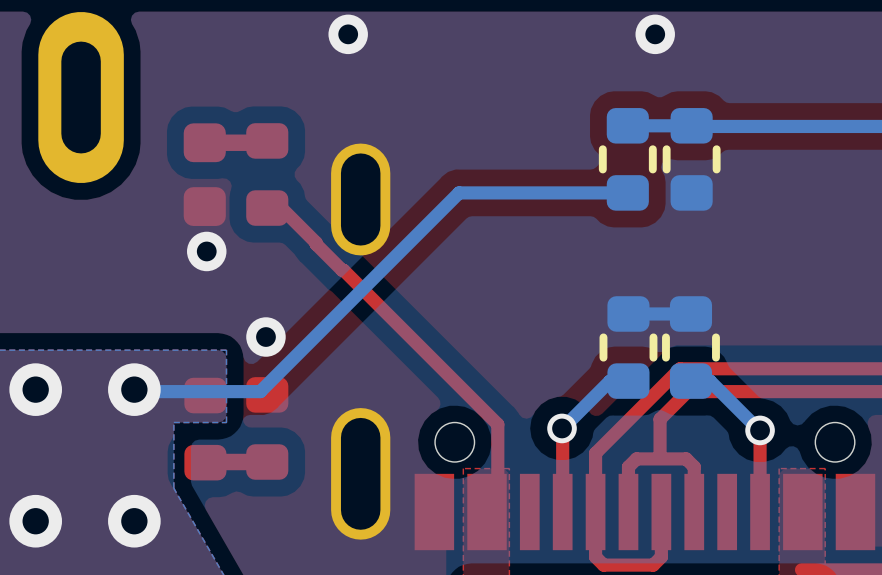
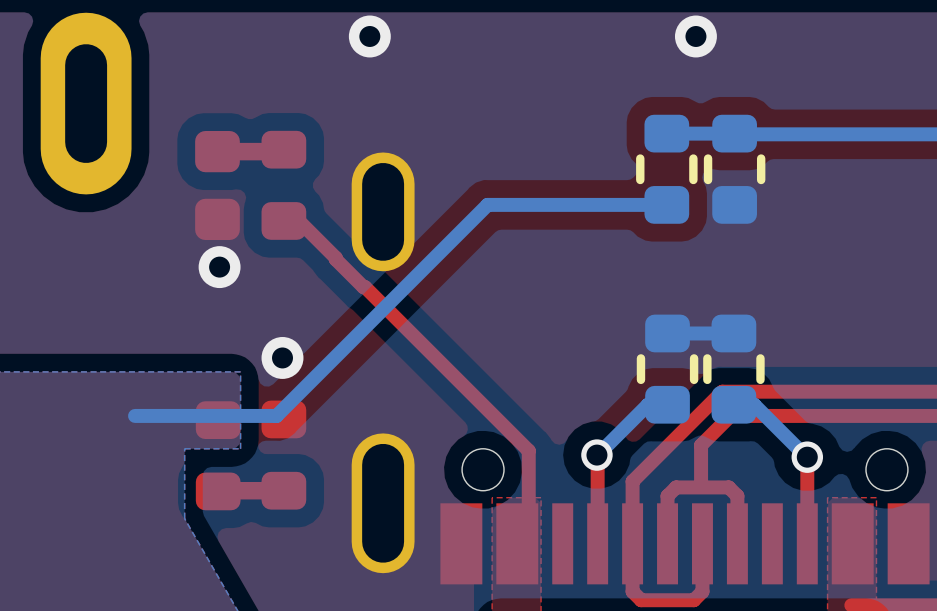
via: (35, 389) -> none
via: (134, 389) -> none
via: (35, 521) -> none
via: (134, 521) -> none

